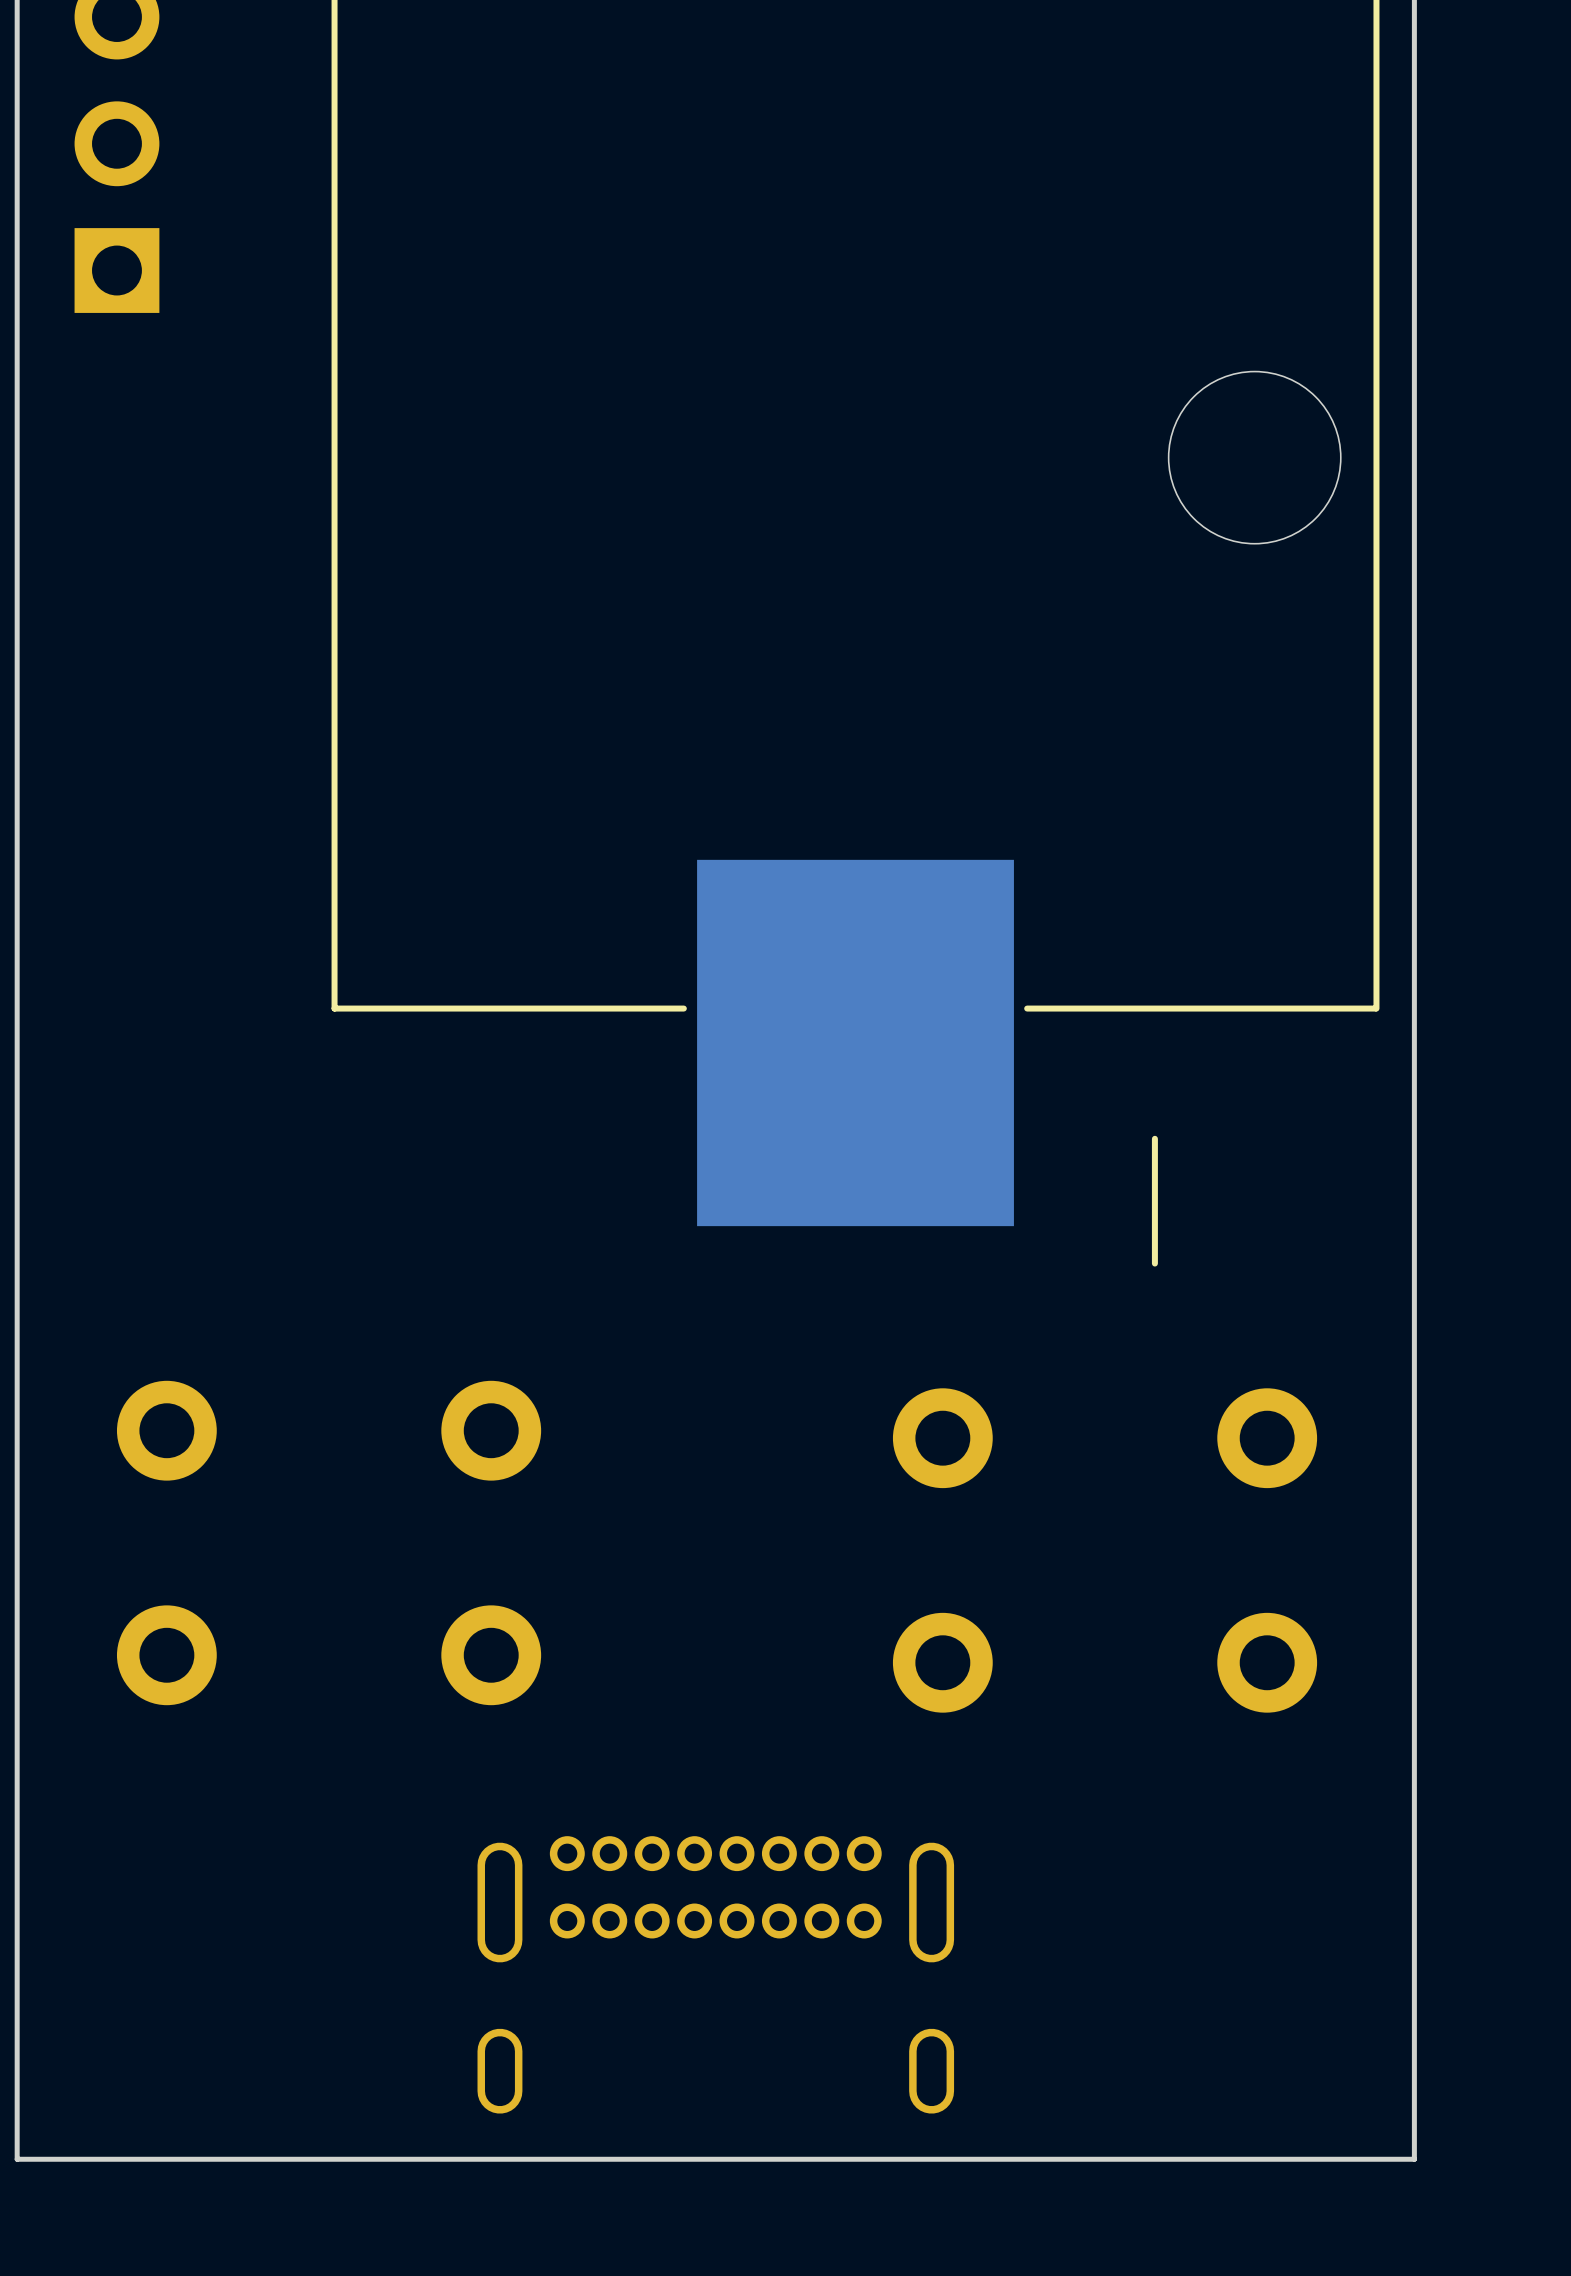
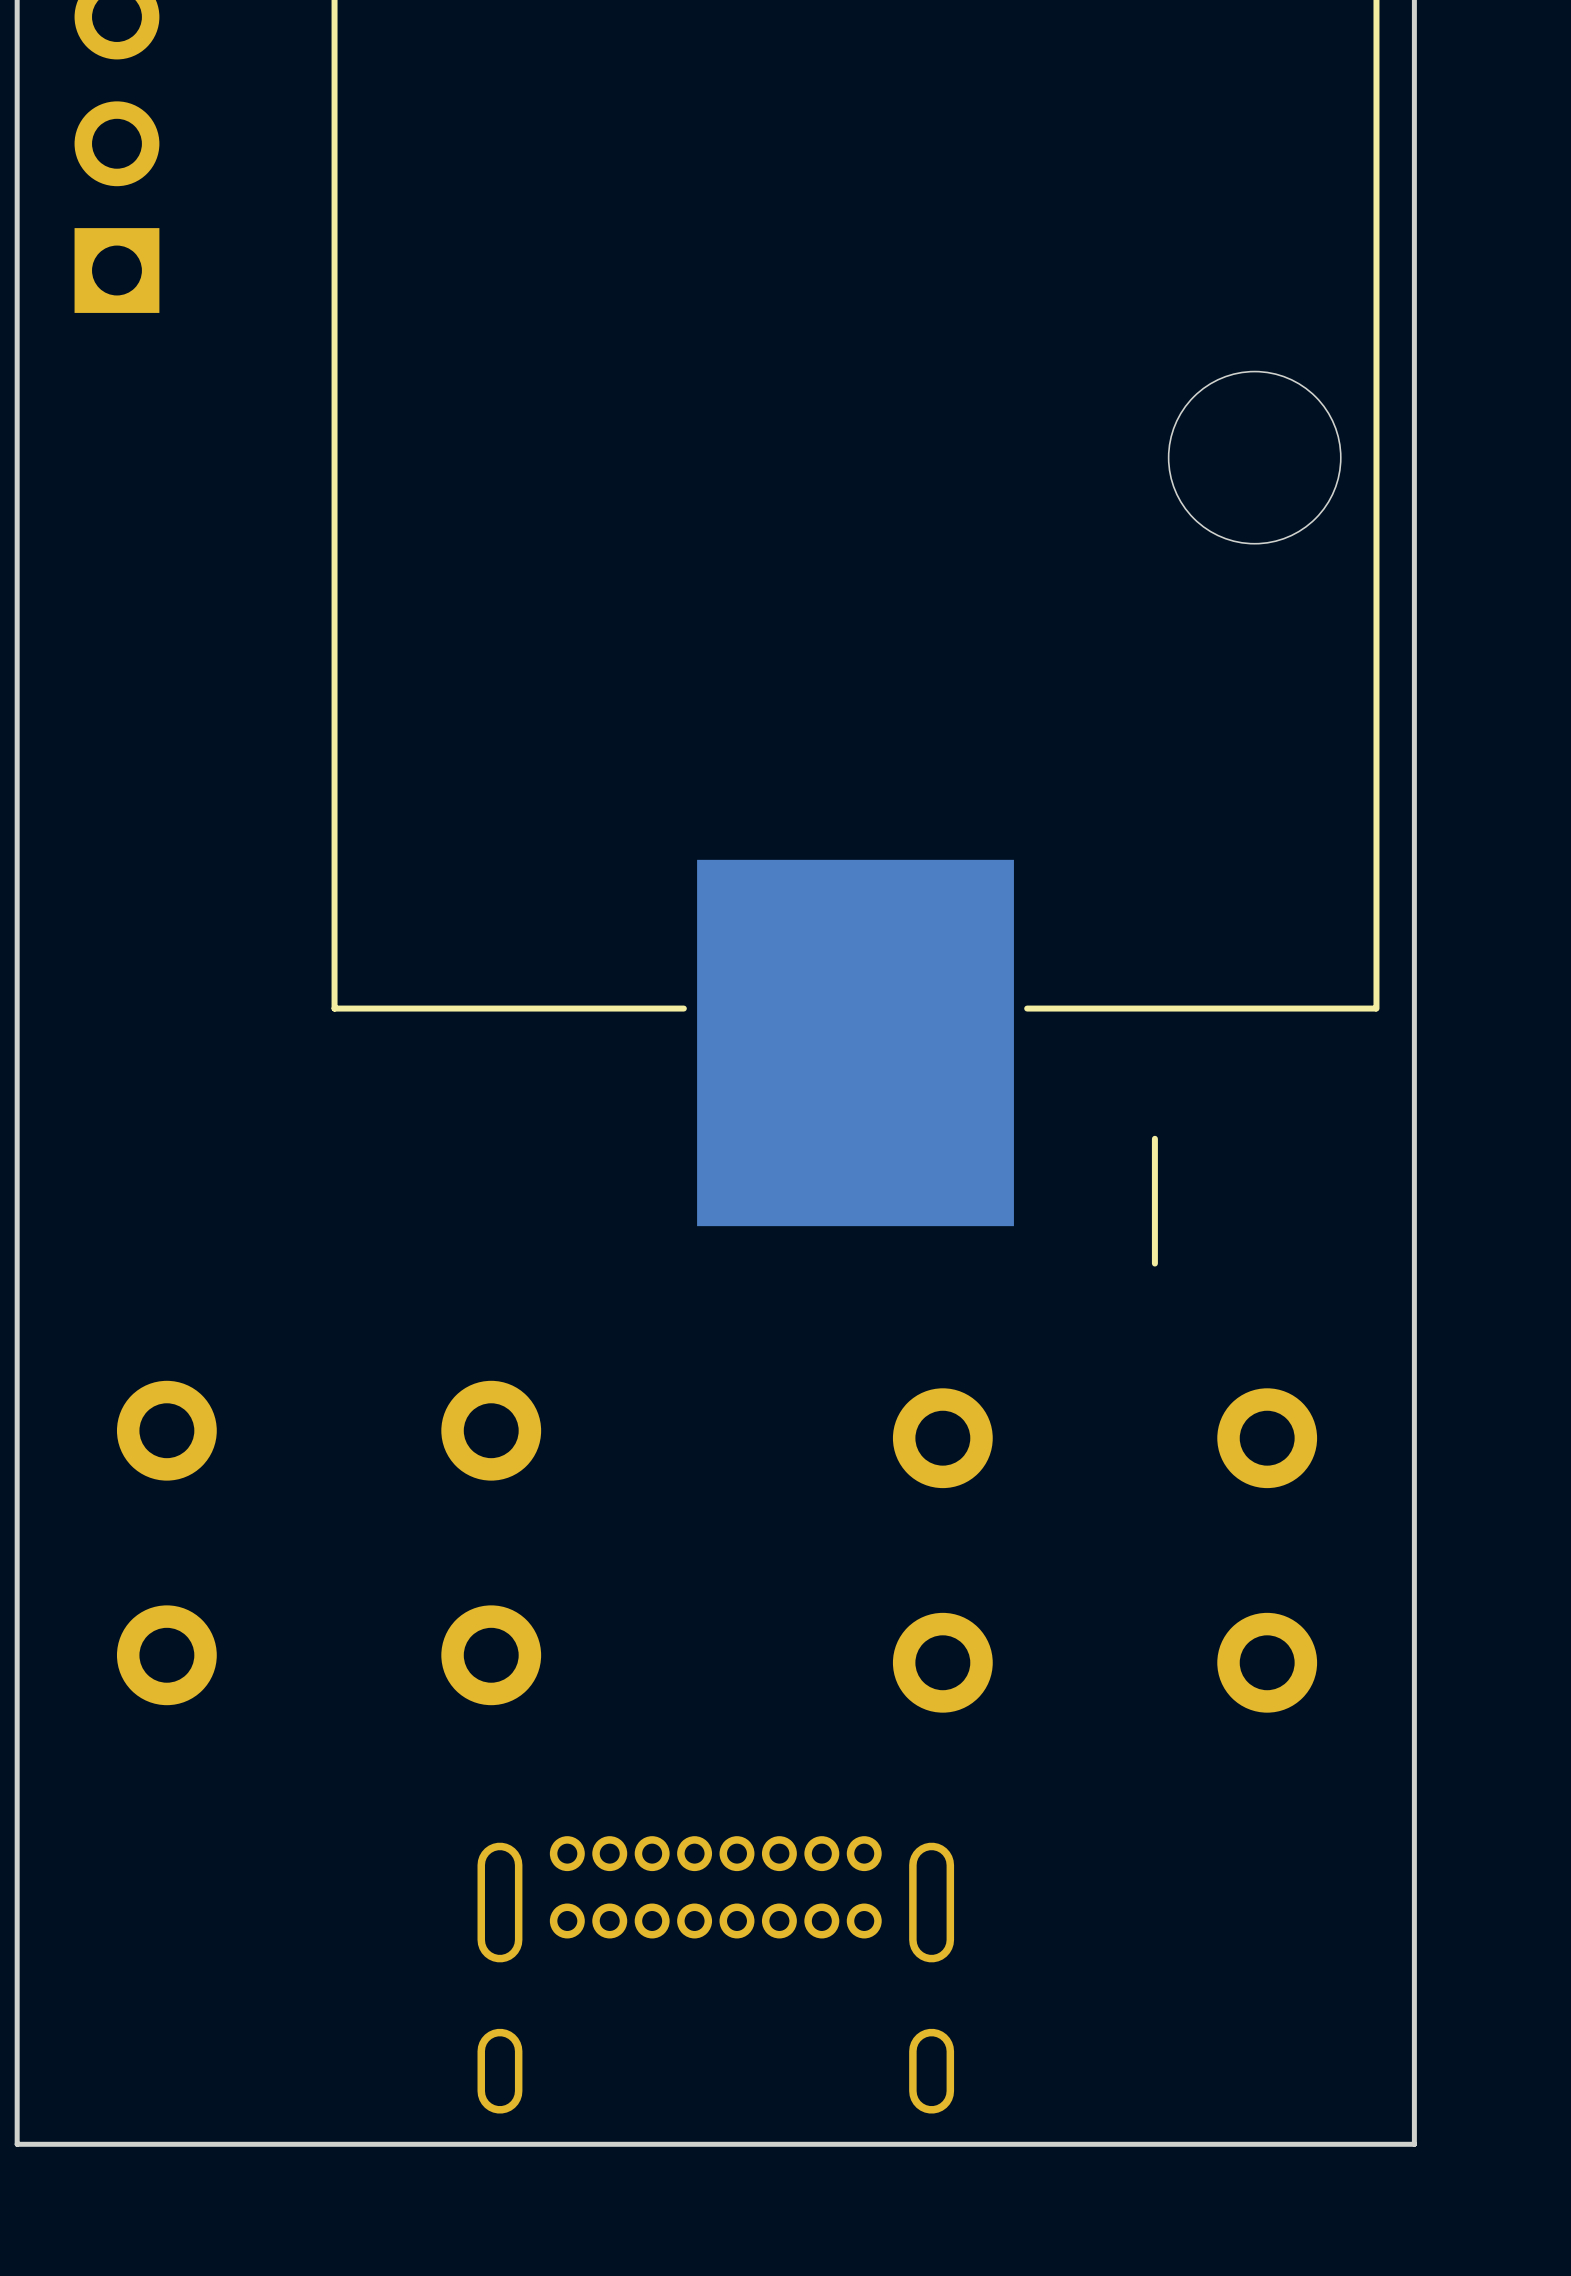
board edge: (1414, 2144) (1414, 2159) (17, 2159) (17, 2144) -> (1414, 2144) (17, 2144)

